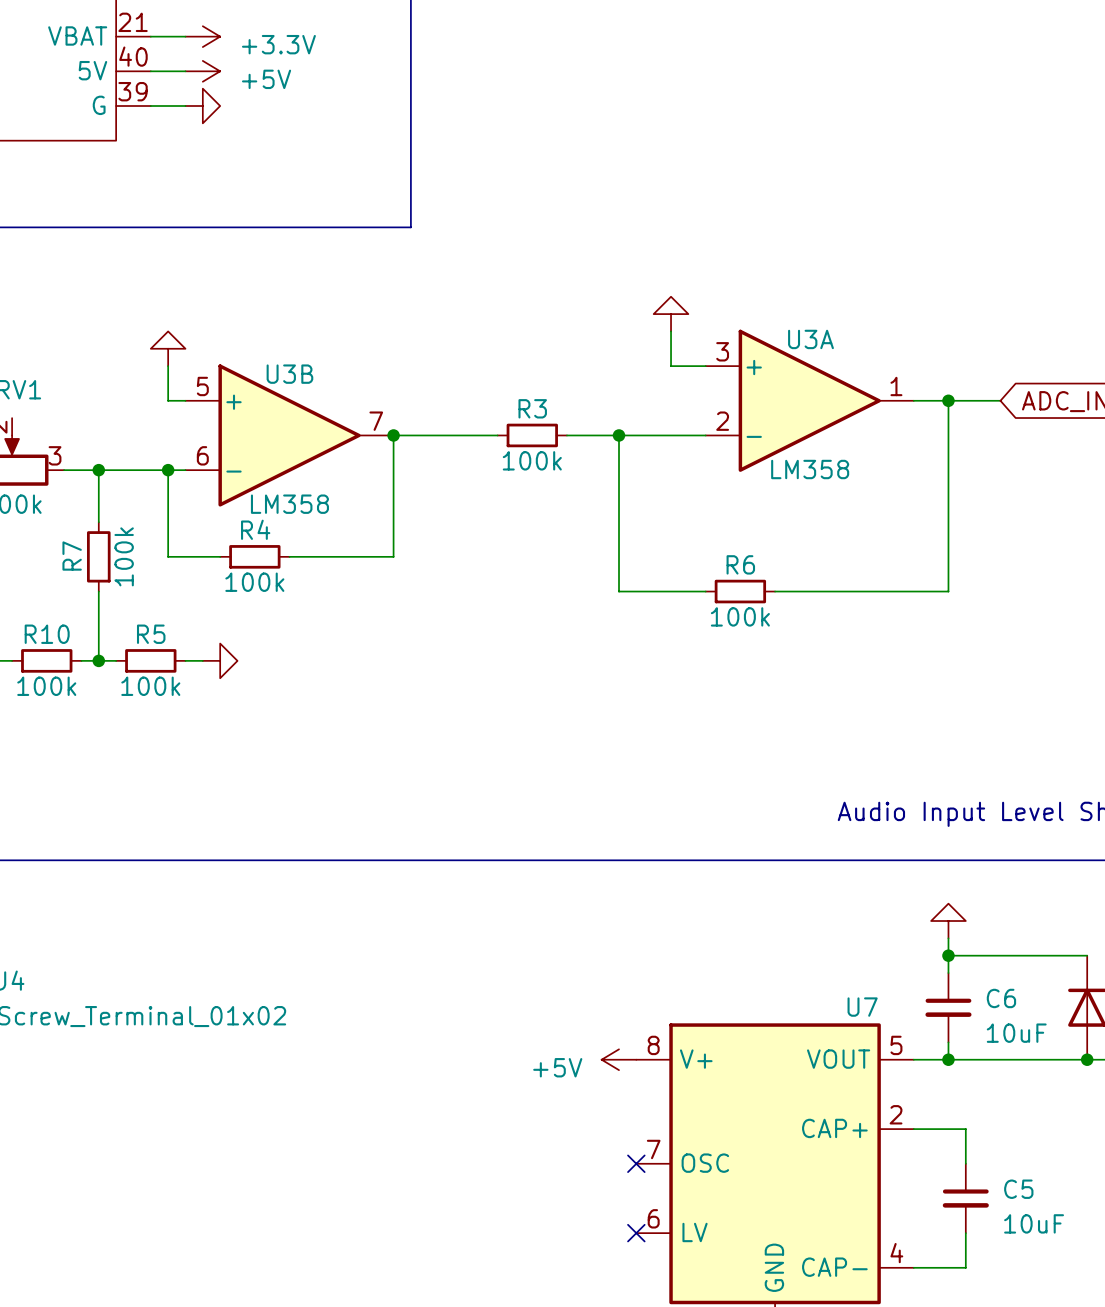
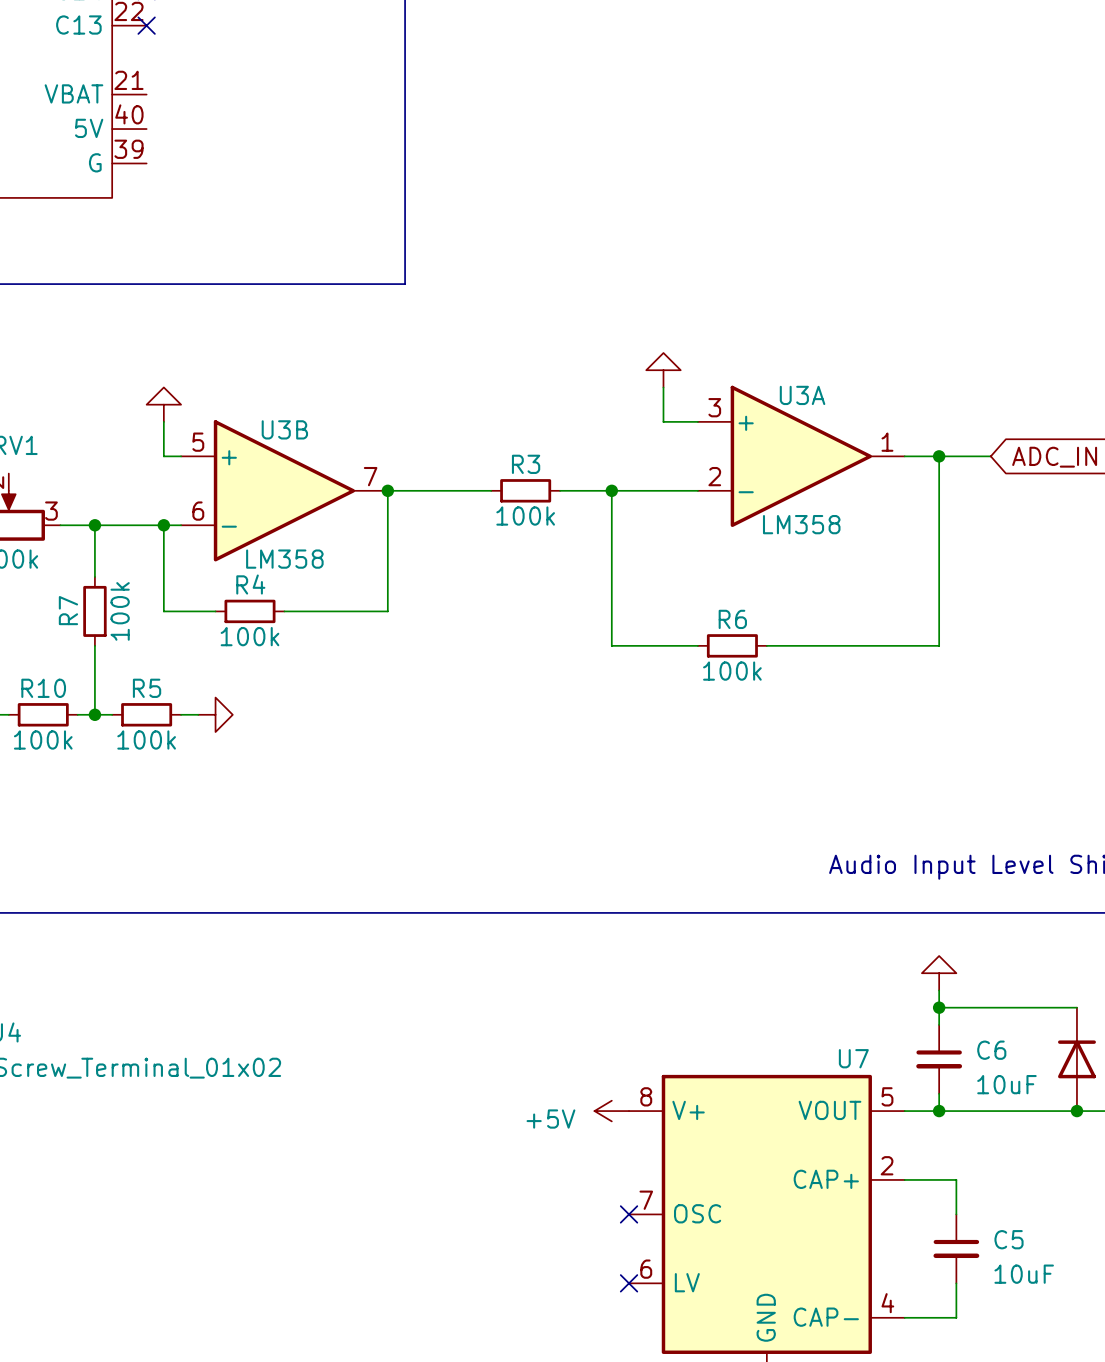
wire: (150, 36) (185, 36) -> none
power symbol: +3.3V (202, 36) -> none
wire: (150, 71) (185, 71) -> none
power symbol: +5V (202, 71) -> none
wire: (150, 106) (185, 106) -> none
power symbol: (202, 106) -> none

